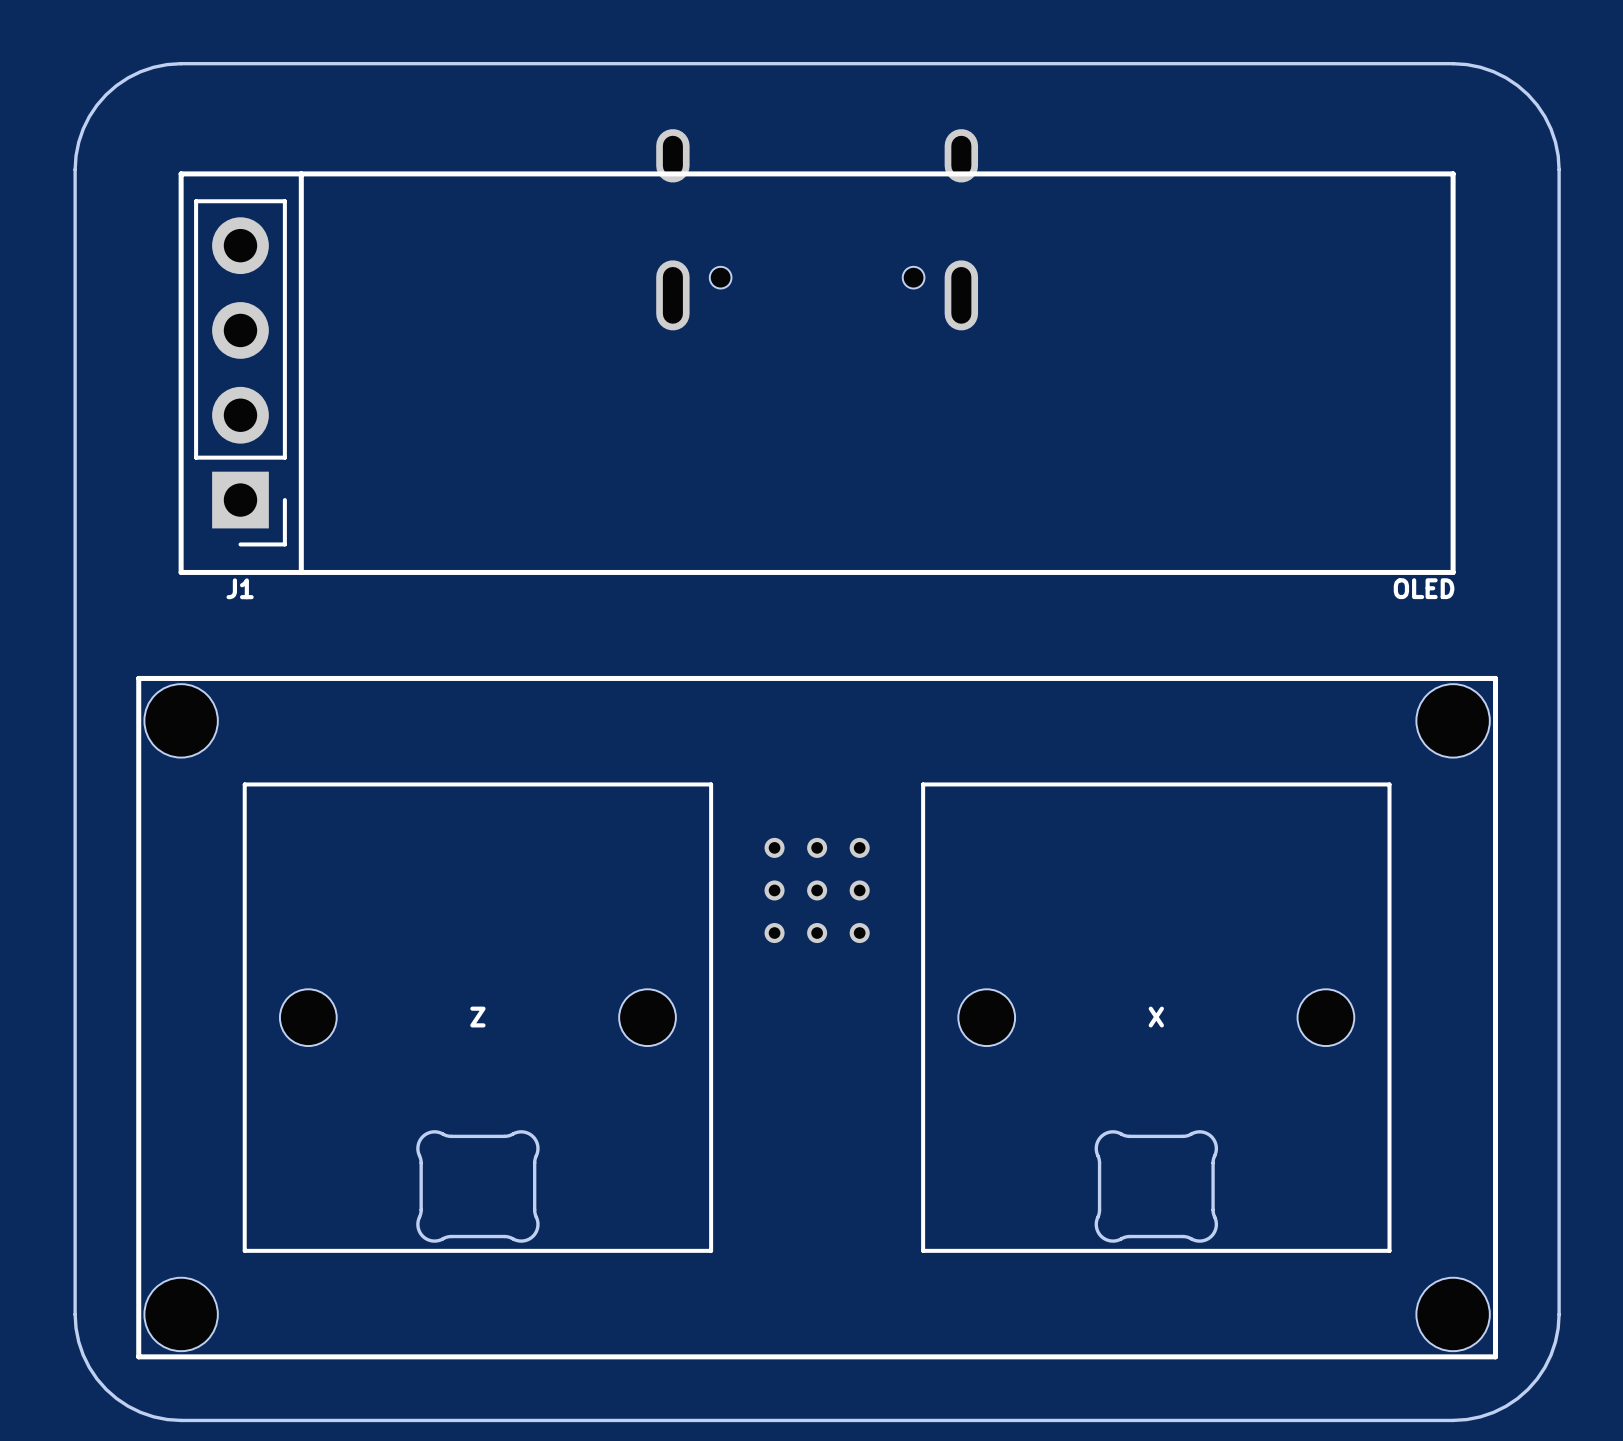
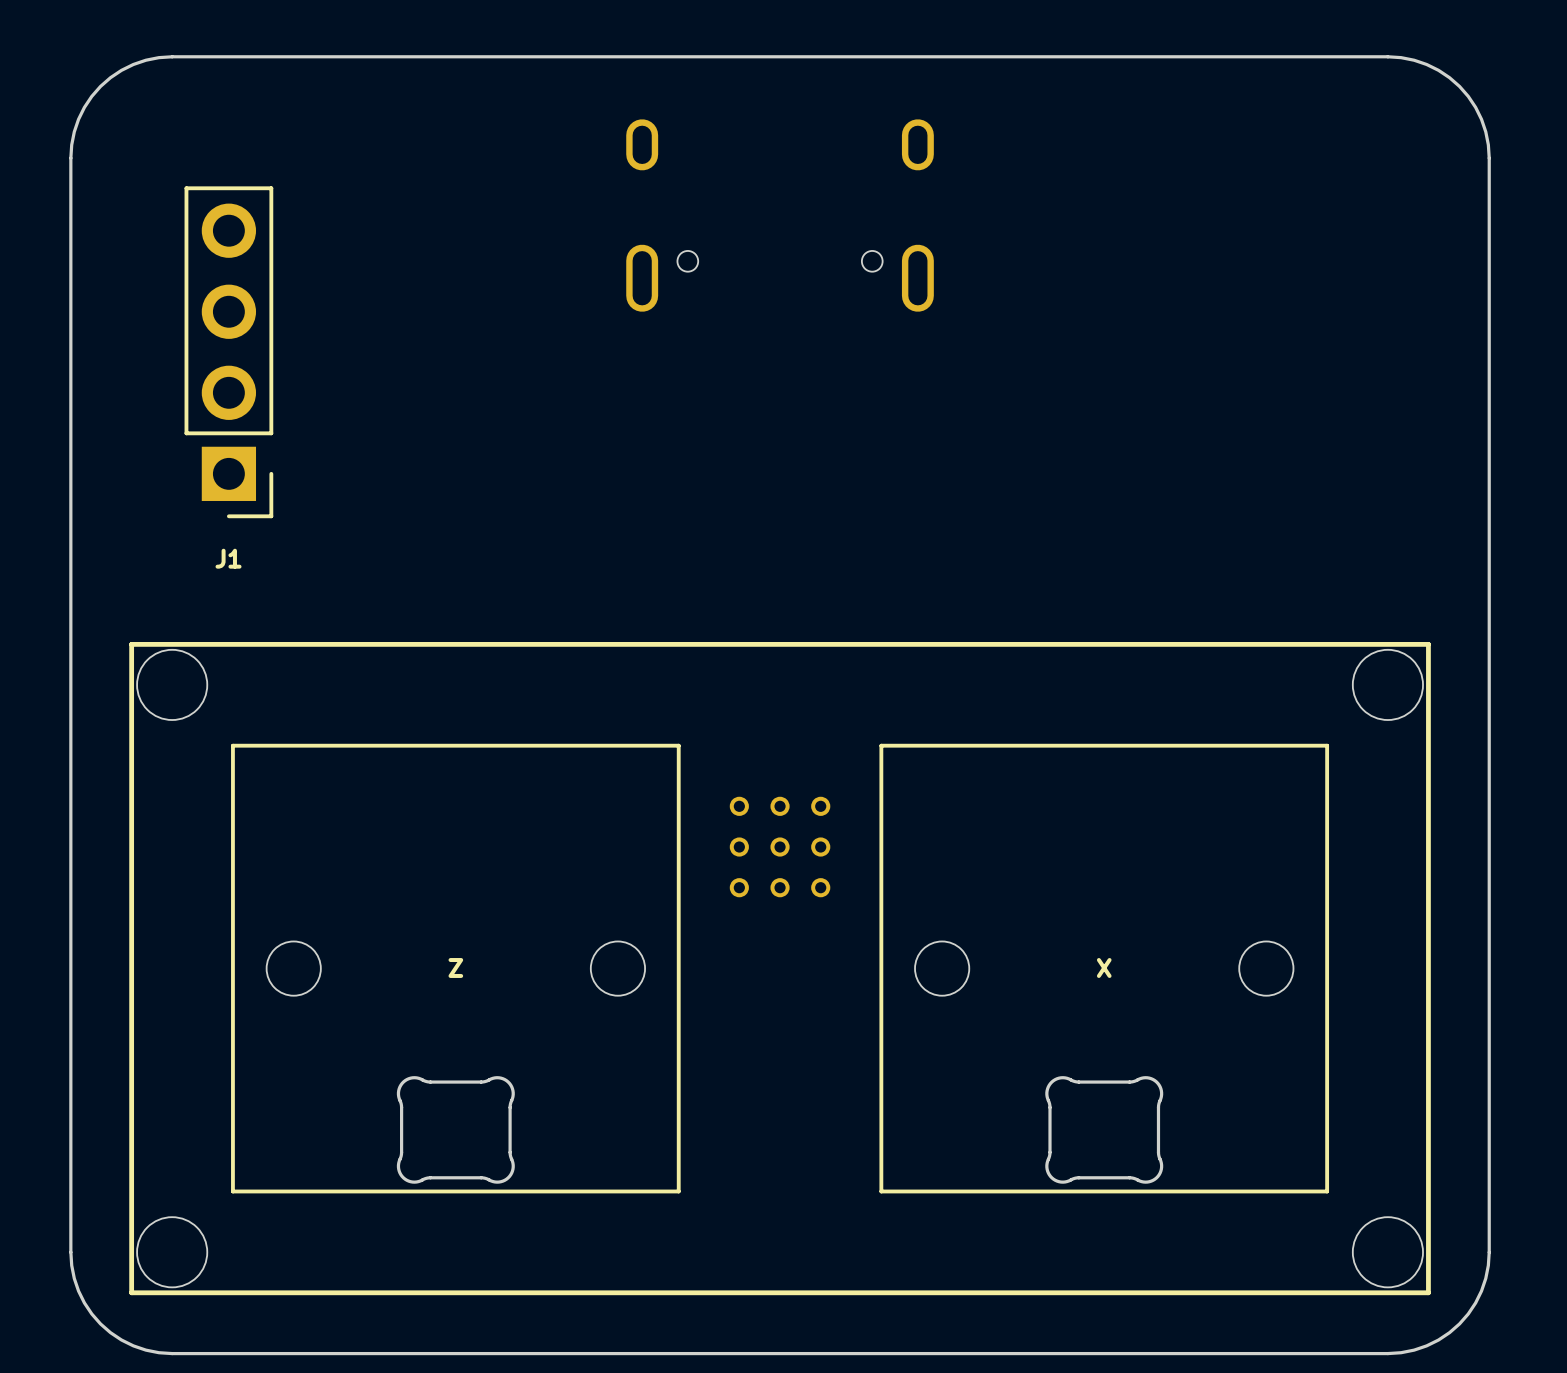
OLED: (817, 373) -> none

